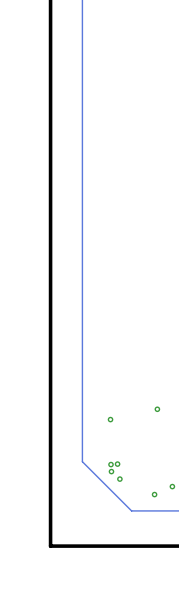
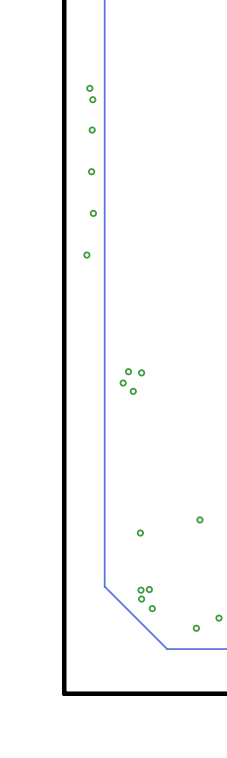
via: none -> (89, 88)
via: none -> (92, 99)
via: none -> (92, 130)
via: none -> (91, 171)
via: none -> (93, 213)
via: none -> (86, 255)
via: none -> (128, 371)
via: none -> (141, 372)
via: none -> (123, 383)
via: none -> (133, 391)

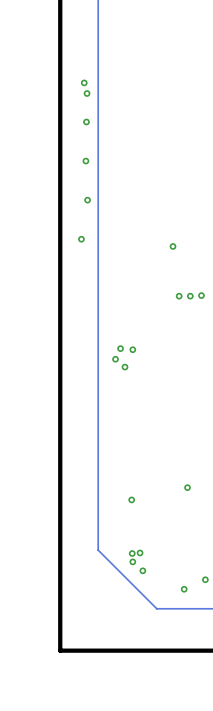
via: none -> (173, 246)
via: none -> (179, 296)
via: none -> (190, 296)
via: none -> (201, 295)

